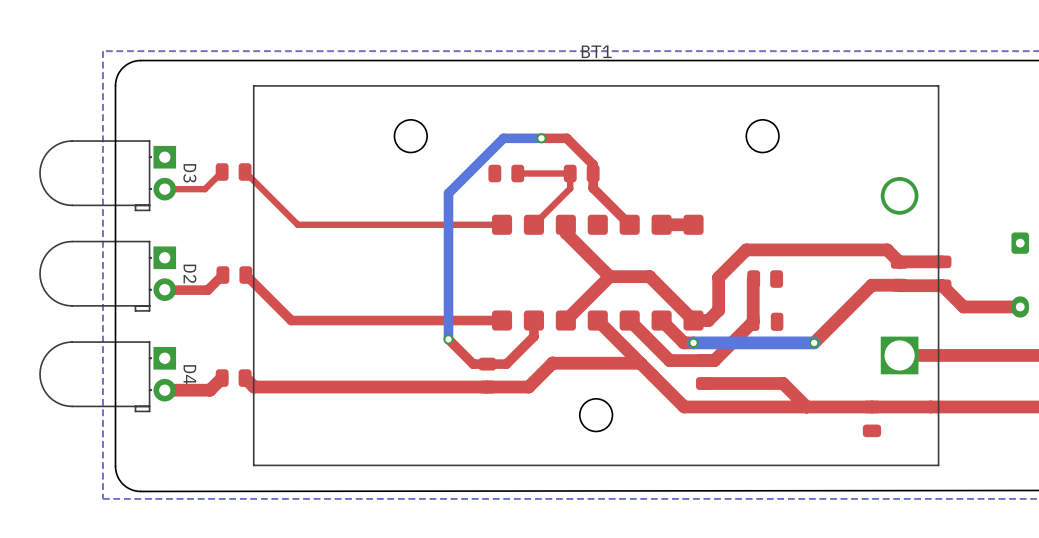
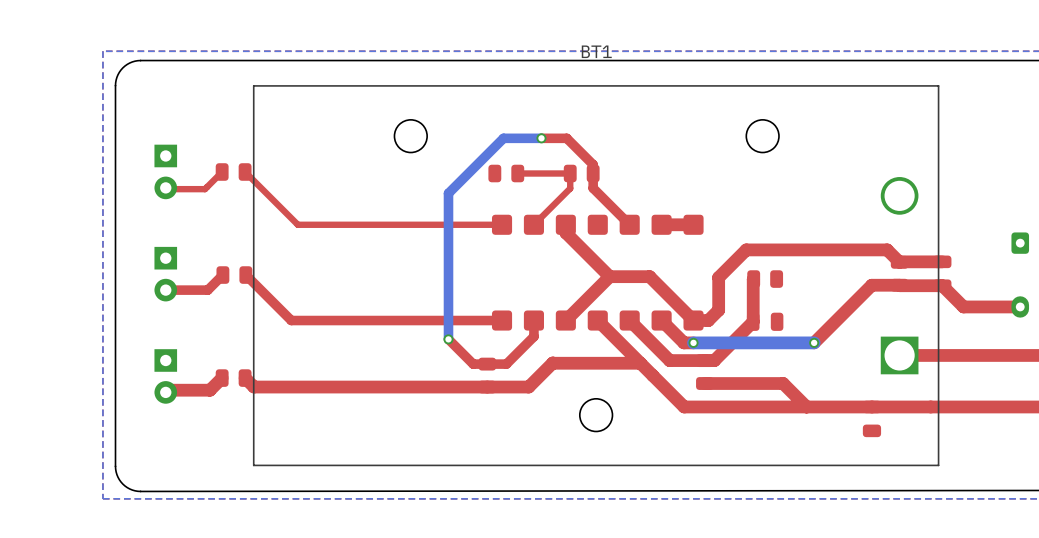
D3 side: bottom (107, 175) -> top (165, 171)
D2 side: bottom (107, 276) -> top (165, 274)
D4 side: bottom (107, 376) -> top (165, 376)

